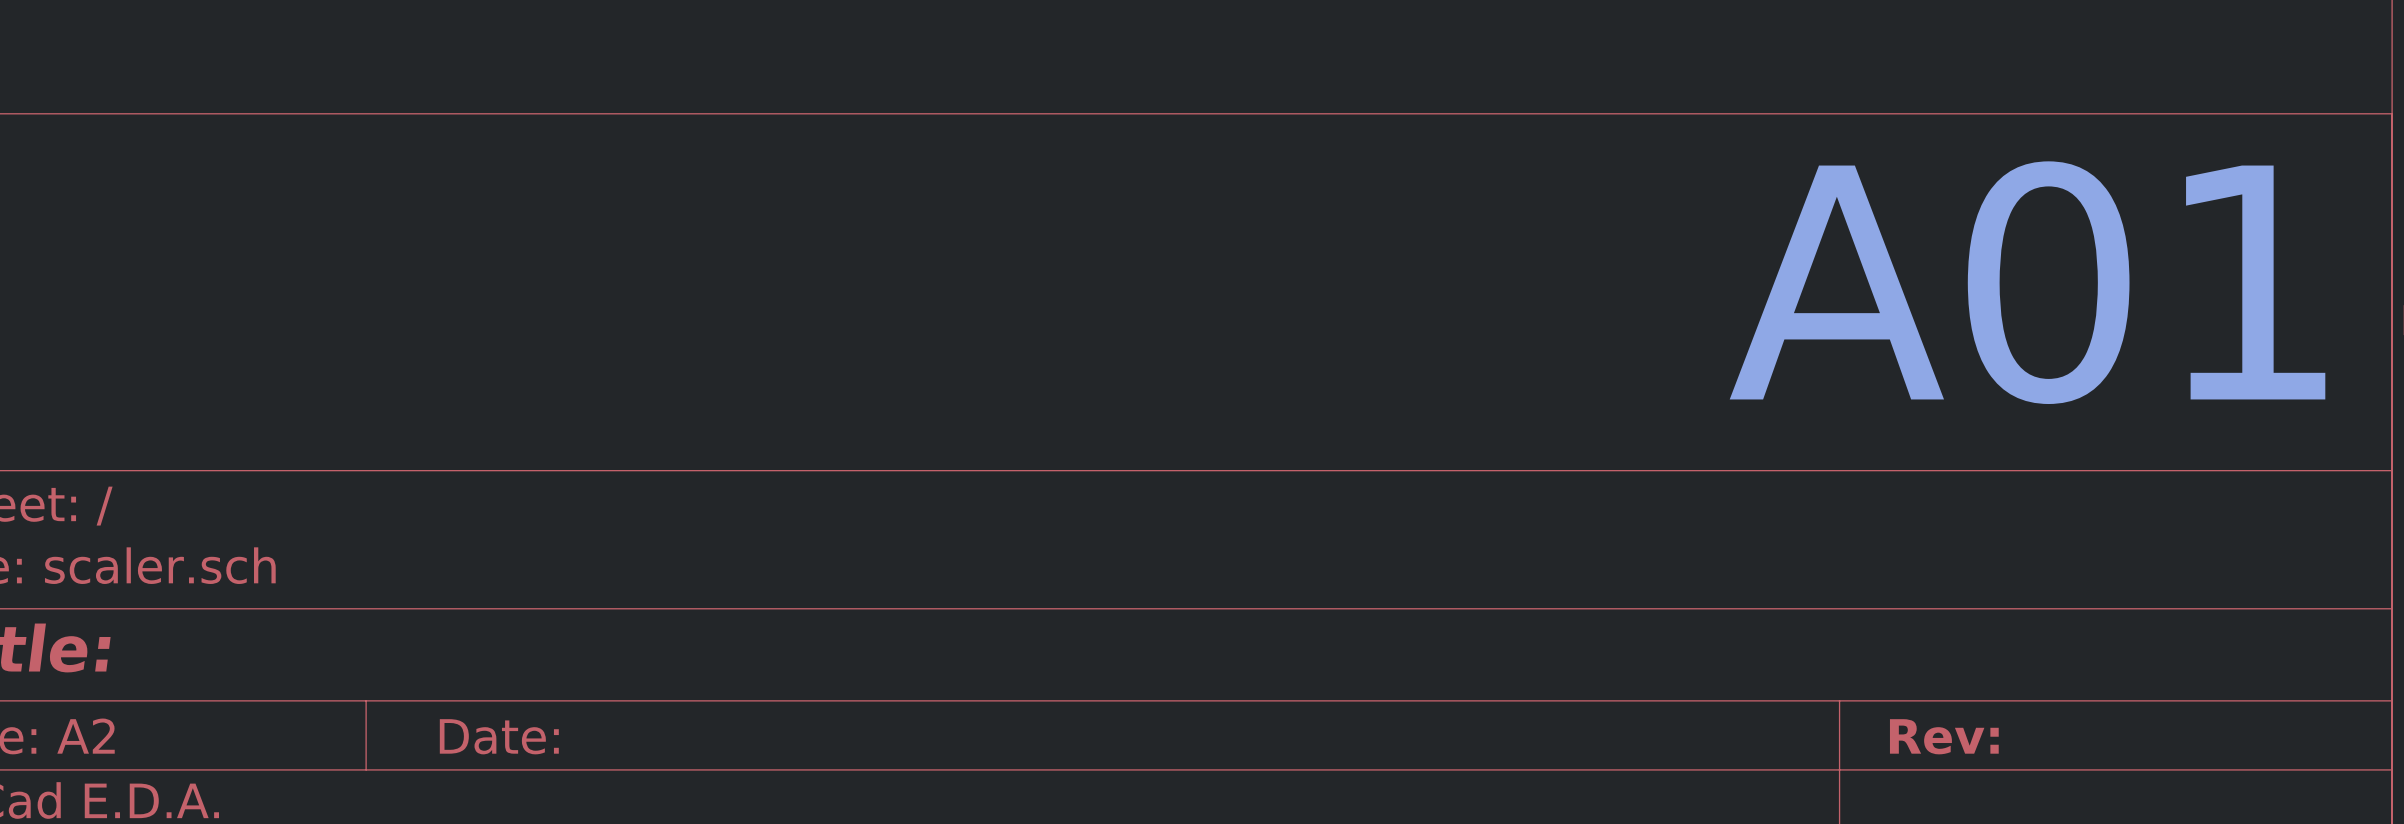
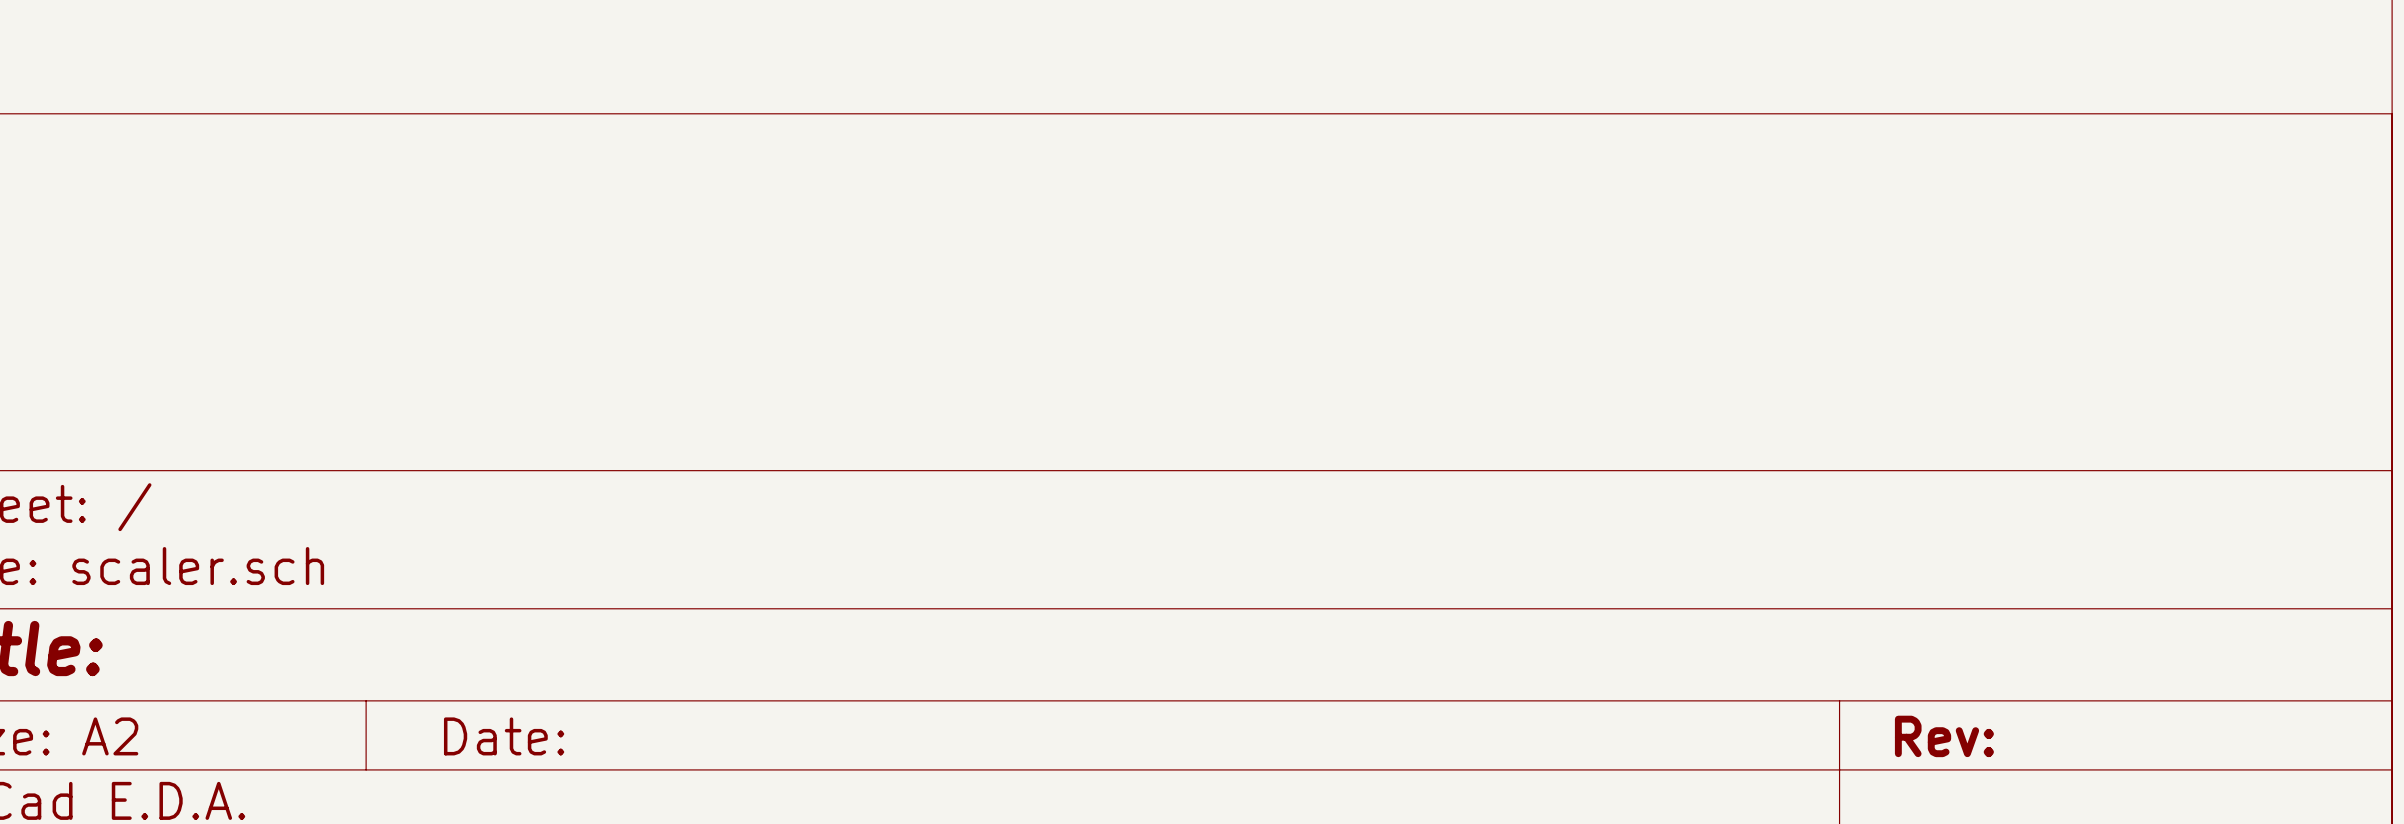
text: A01 (2027, 282) -> none

